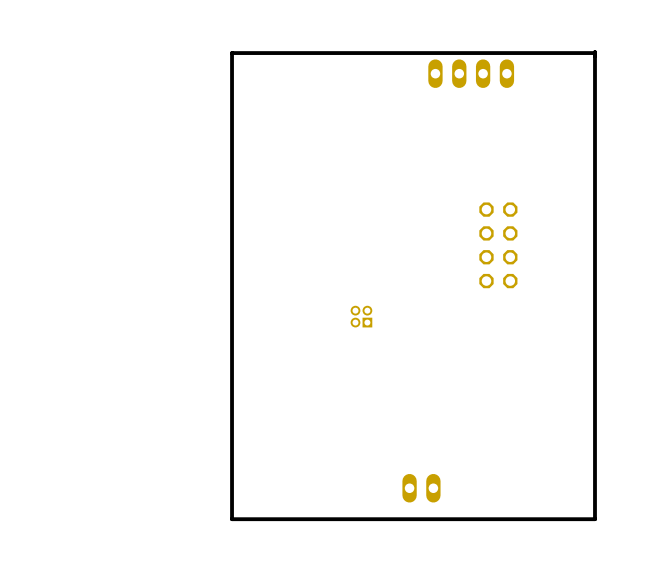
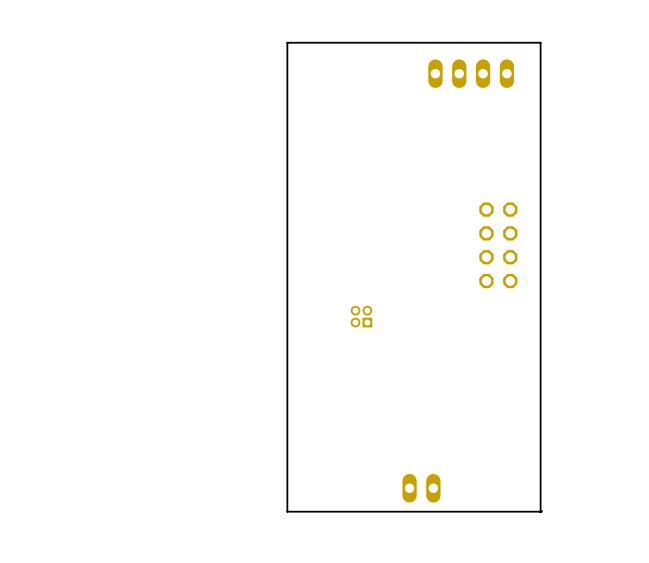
board edge: (594, 52) (594, 519) (232, 519) (232, 53) (594, 53) -> none
board edge: none -> (541, 510) (541, 511) (287, 511) (287, 42) (540, 42) (540, 511)

